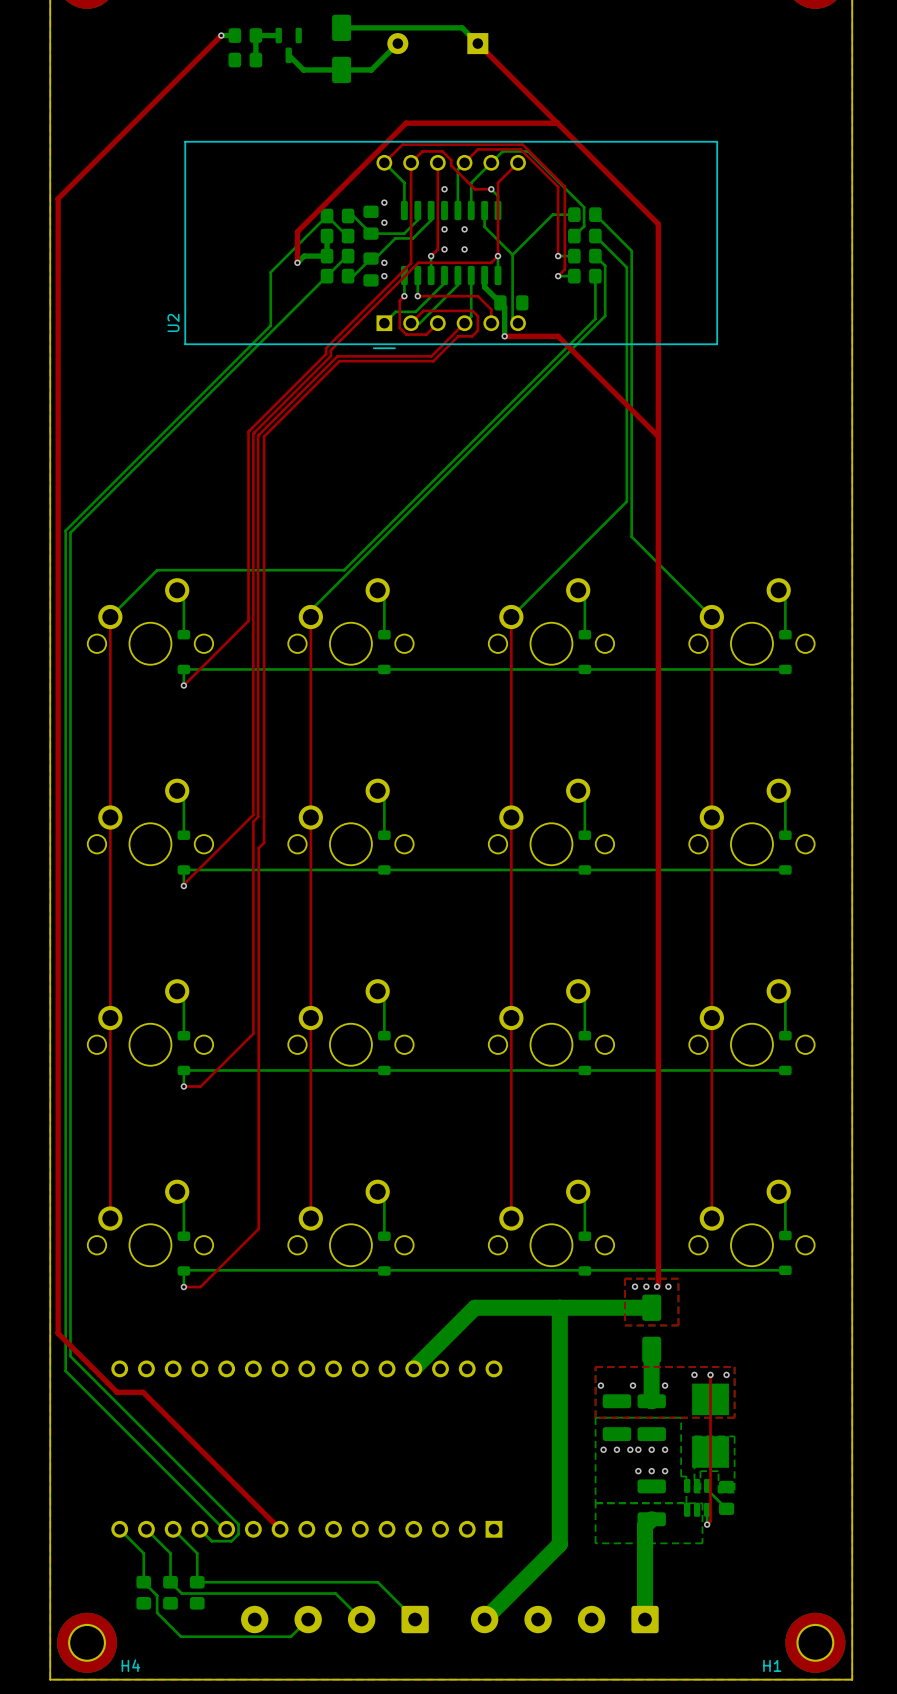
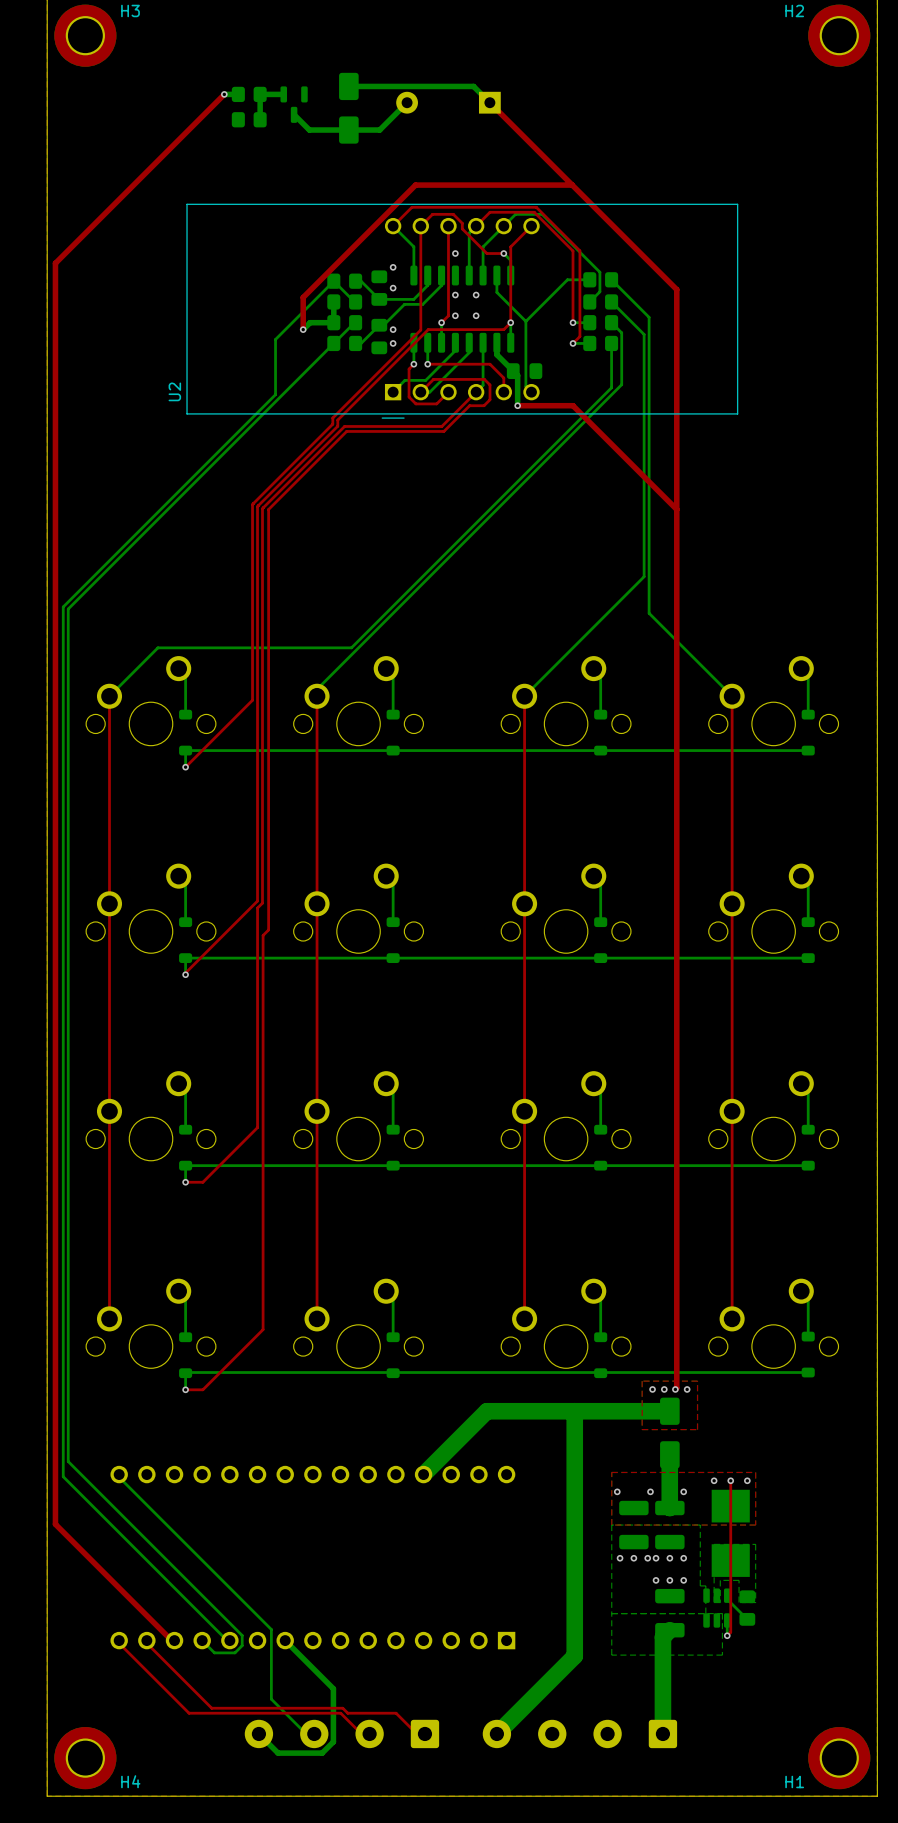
top track: (58, 1333) (117, 1392) (143, 1392) (280, 1529) -> (55, 1437) (55, 1524) (171, 1640)
bottom track: none -> (116, 1474) (271, 1629) (271, 1699) (315, 1743)
top track: none -> (116, 1640) (189, 1713) (340, 1713) (370, 1743)
bottom track: (119, 1529) (143, 1553) (143, 1582) (157, 1595) (157, 1612) (180, 1636) (291, 1636) (308, 1619) -> none
top track: none -> (144, 1640) (211, 1708) (342, 1708) (347, 1713) (396, 1713) (426, 1743)
bottom track: (146, 1529) (170, 1553) (170, 1582) (181, 1593) (335, 1593) (361, 1619) -> none
bottom track: (173, 1529) (197, 1553) (197, 1582) (377, 1582) (415, 1619) -> none
bottom track: none -> (285, 1640) (333, 1688) (333, 1741) (322, 1753) (278, 1753) (258, 1733)
part: (143, 1592) -> none
part: (170, 1592) -> none
part: (197, 1592) -> none

